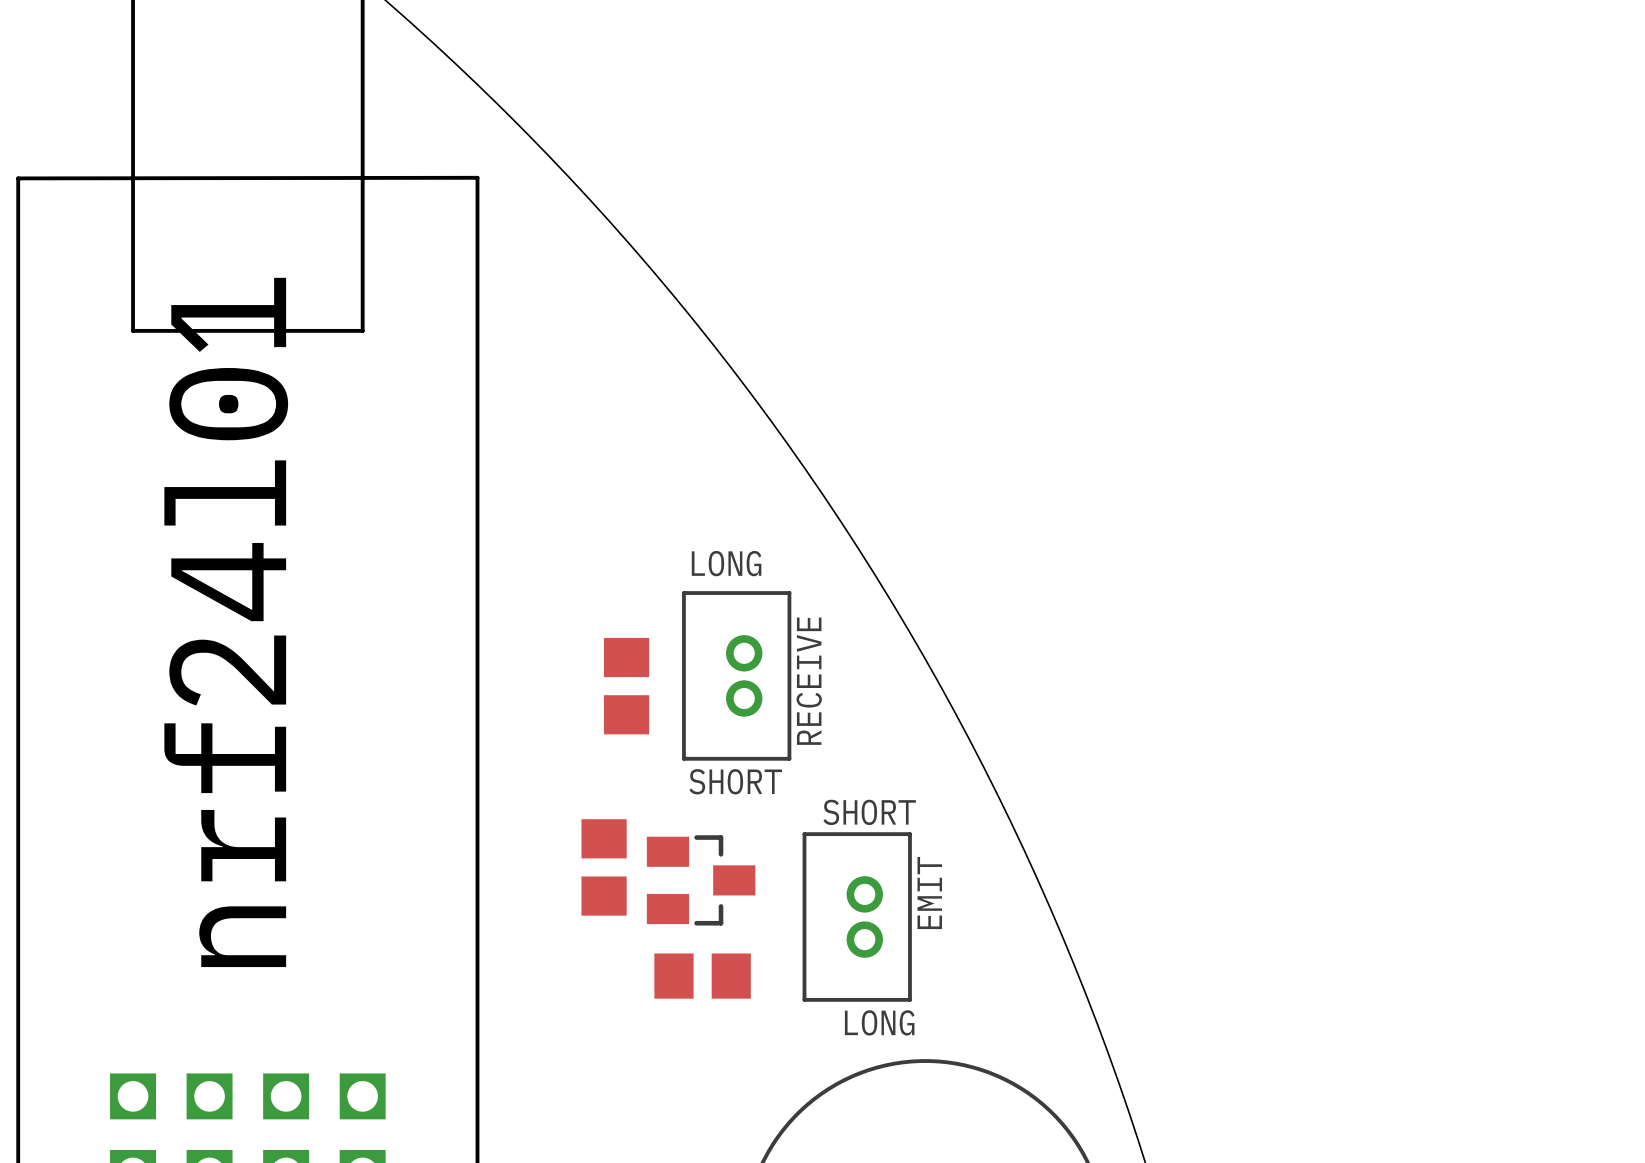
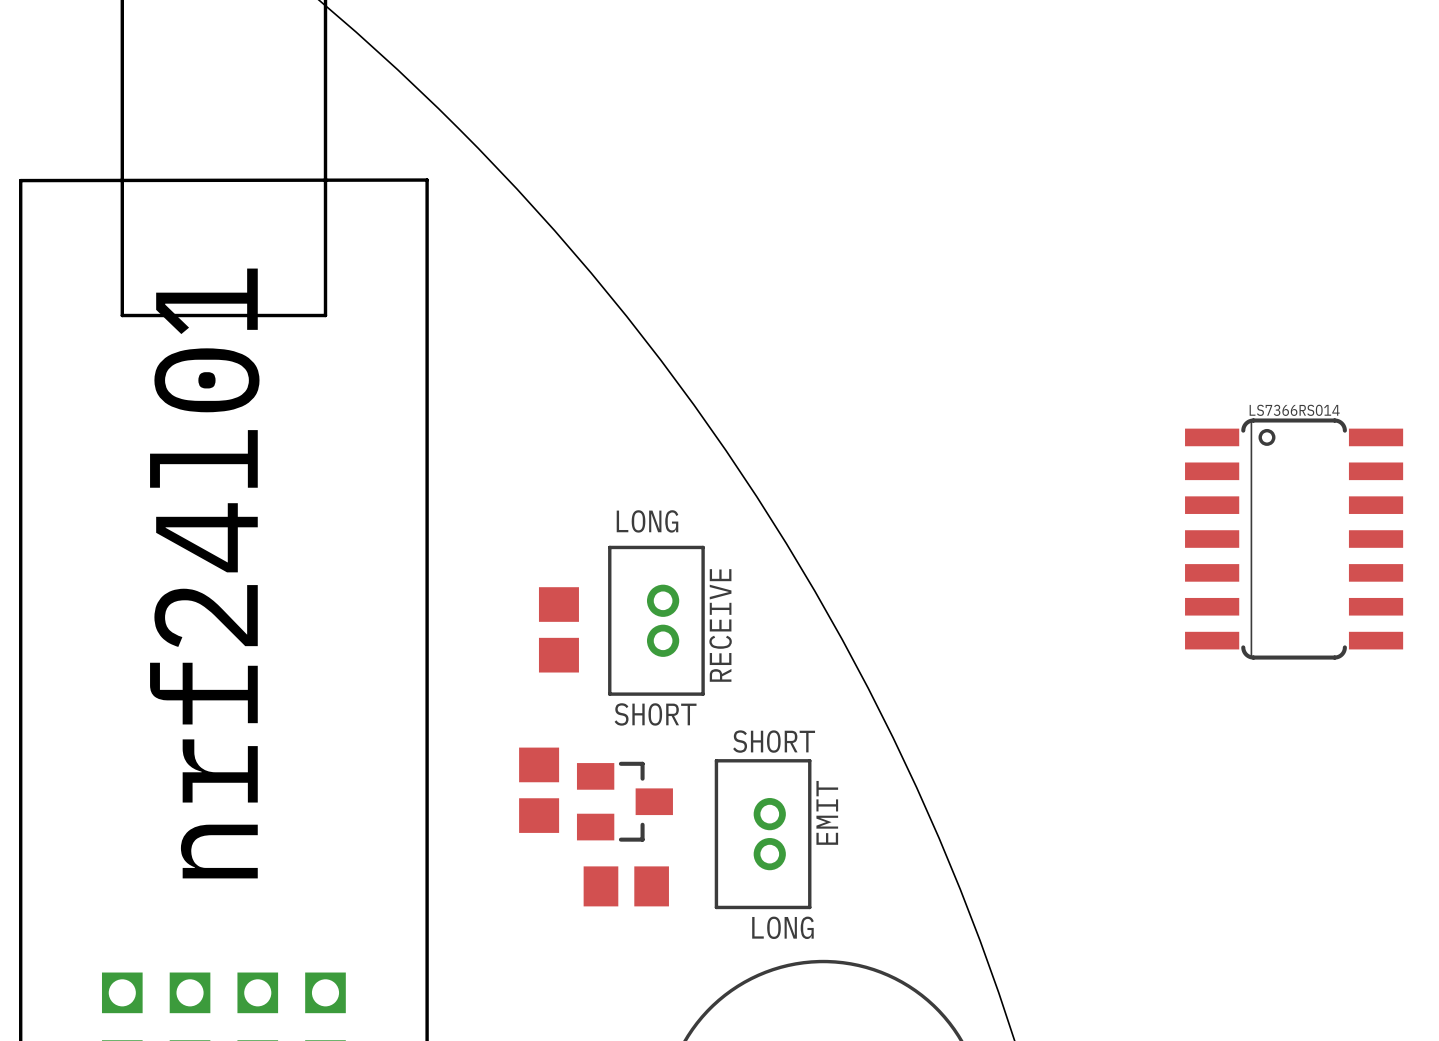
part: none -> LS7366RSO14 (1294, 539)

